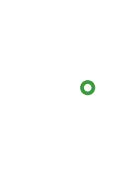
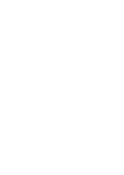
via: (87, 87) -> none

